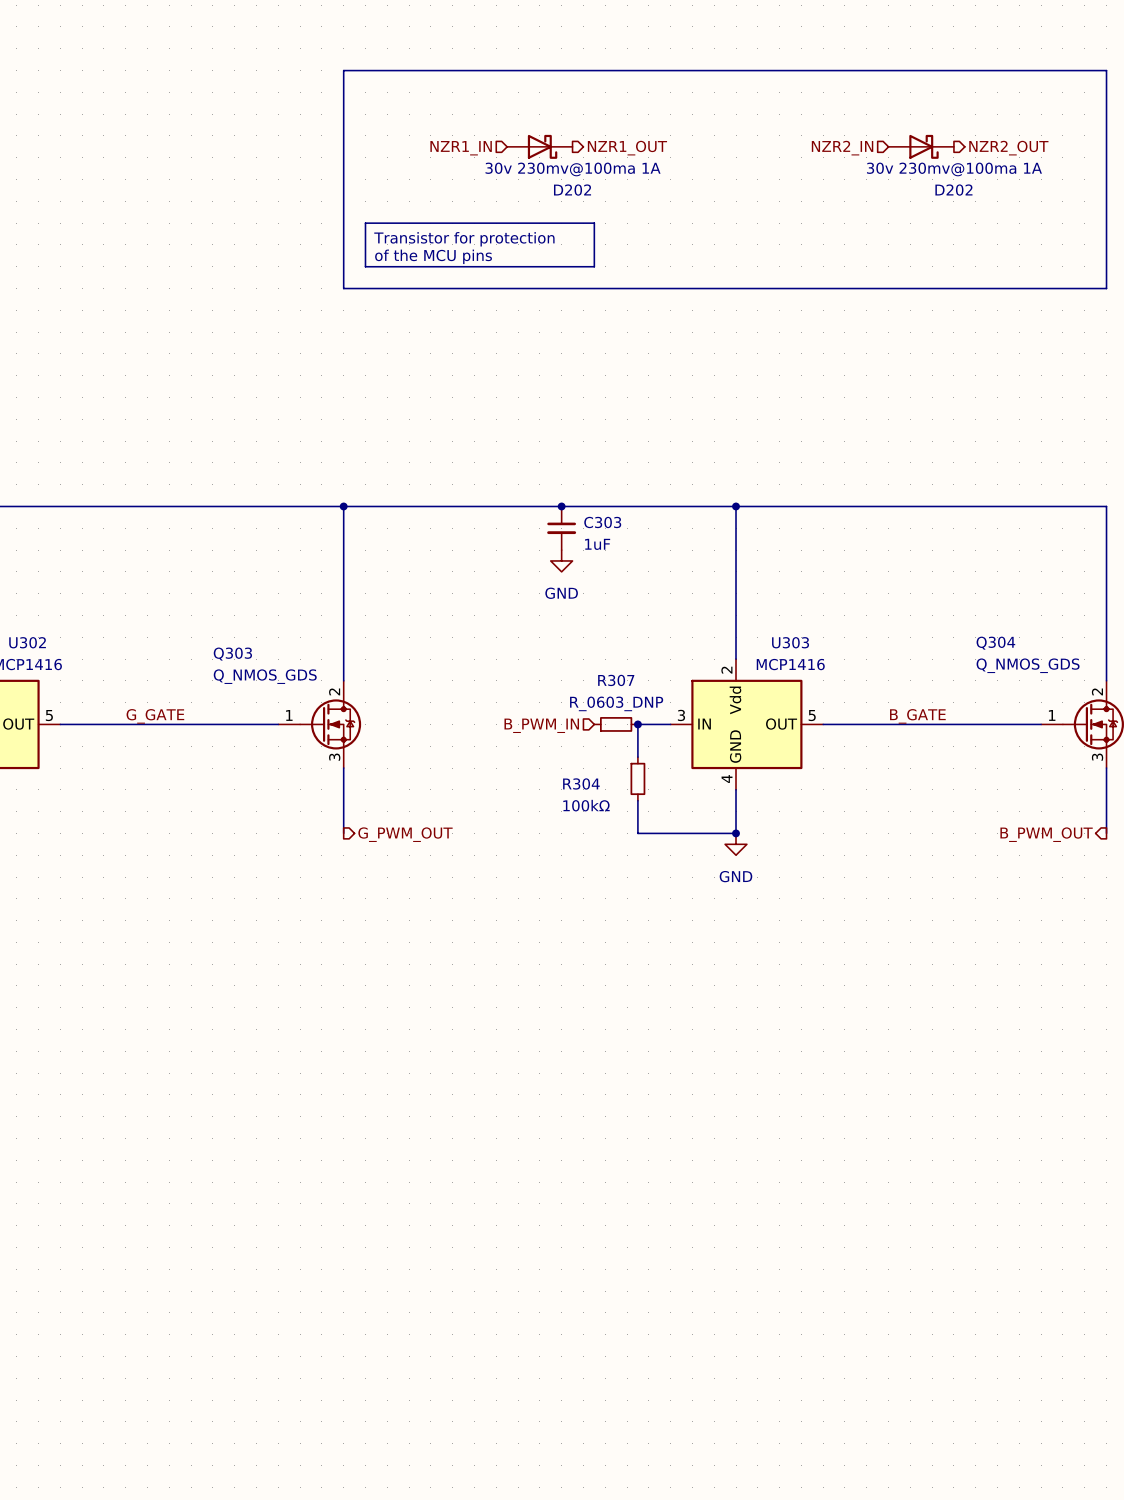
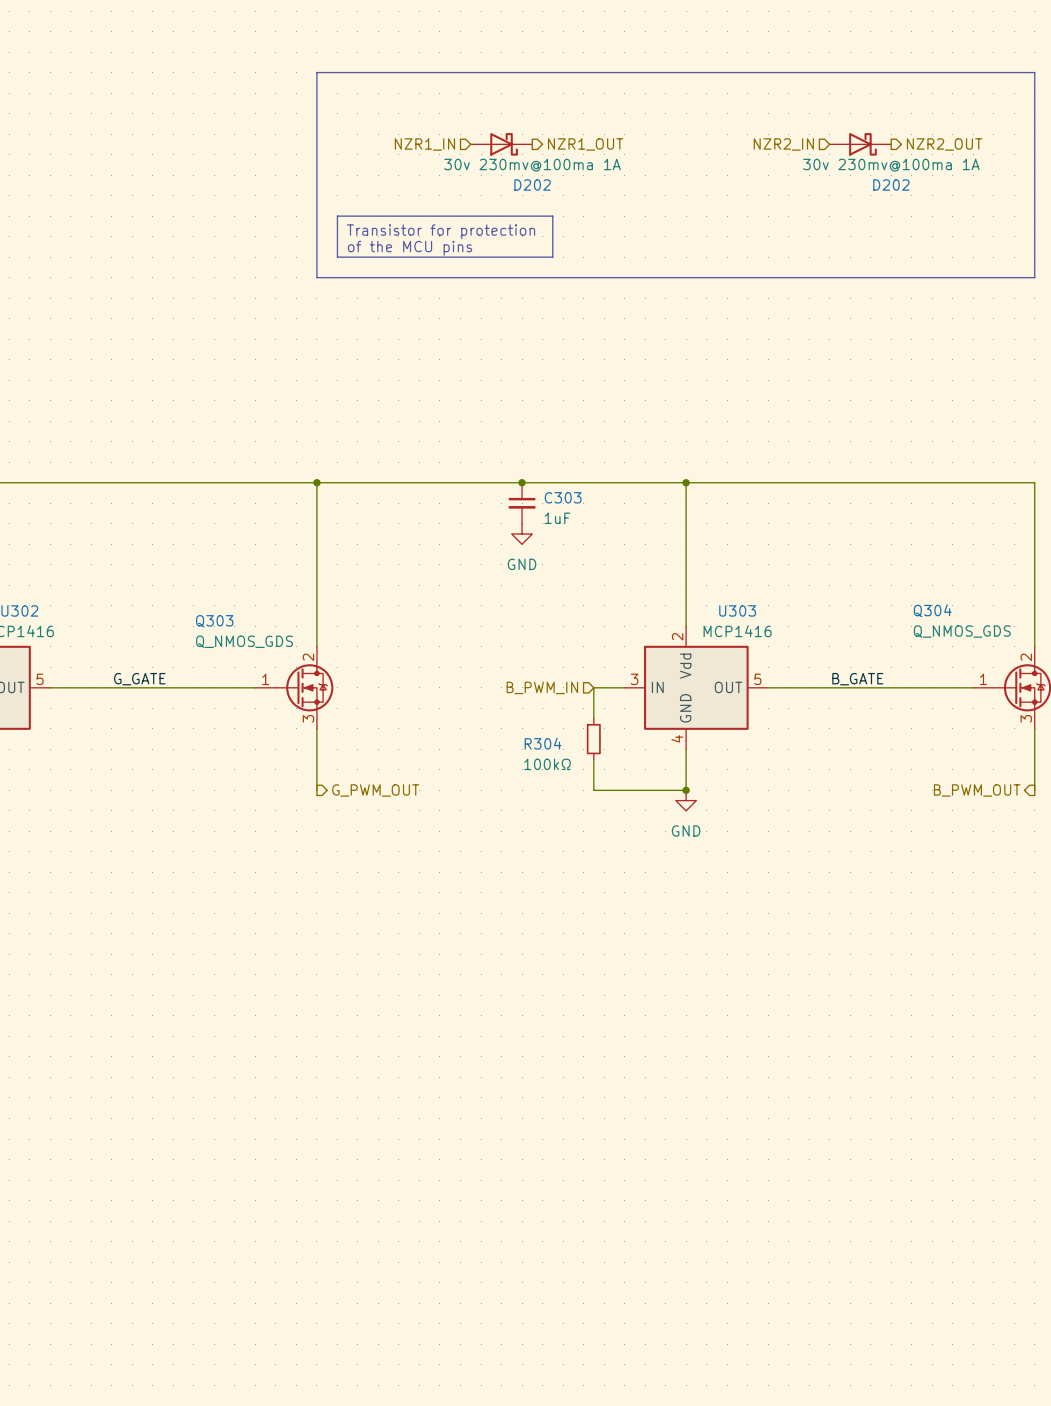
R307: R_0603_DNP (616, 724) -> none
junction: (637, 724) -> none
hierarchical label position: B_PWM_IN (541, 725) -> B_PWM_IN (542, 687)

